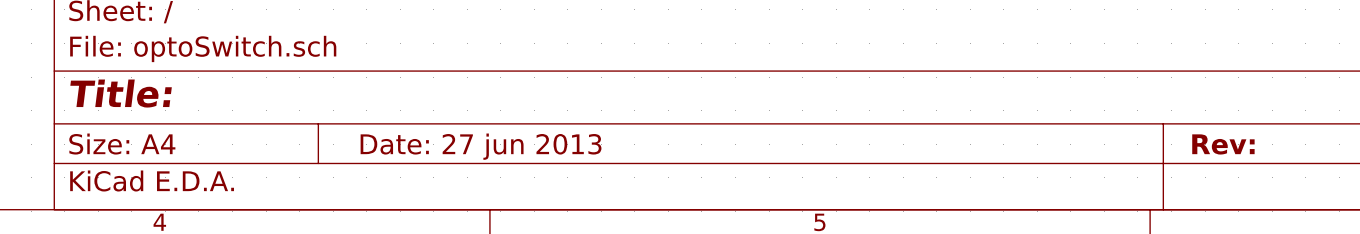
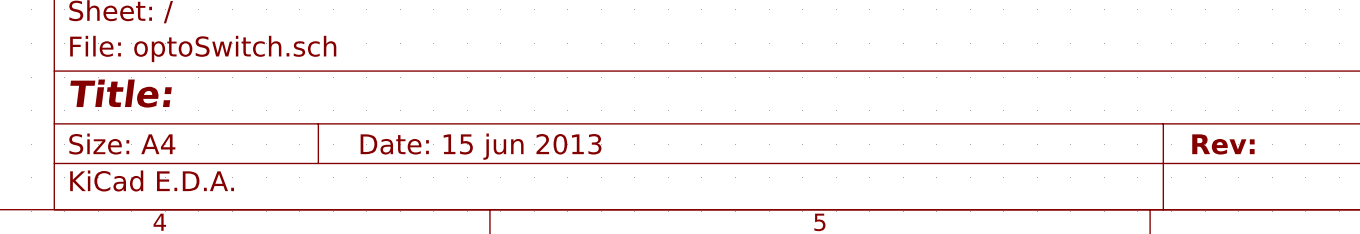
title block: Date: 27 jun 2013 (481, 146) -> Date: 15 jun 2013 (481, 146)

